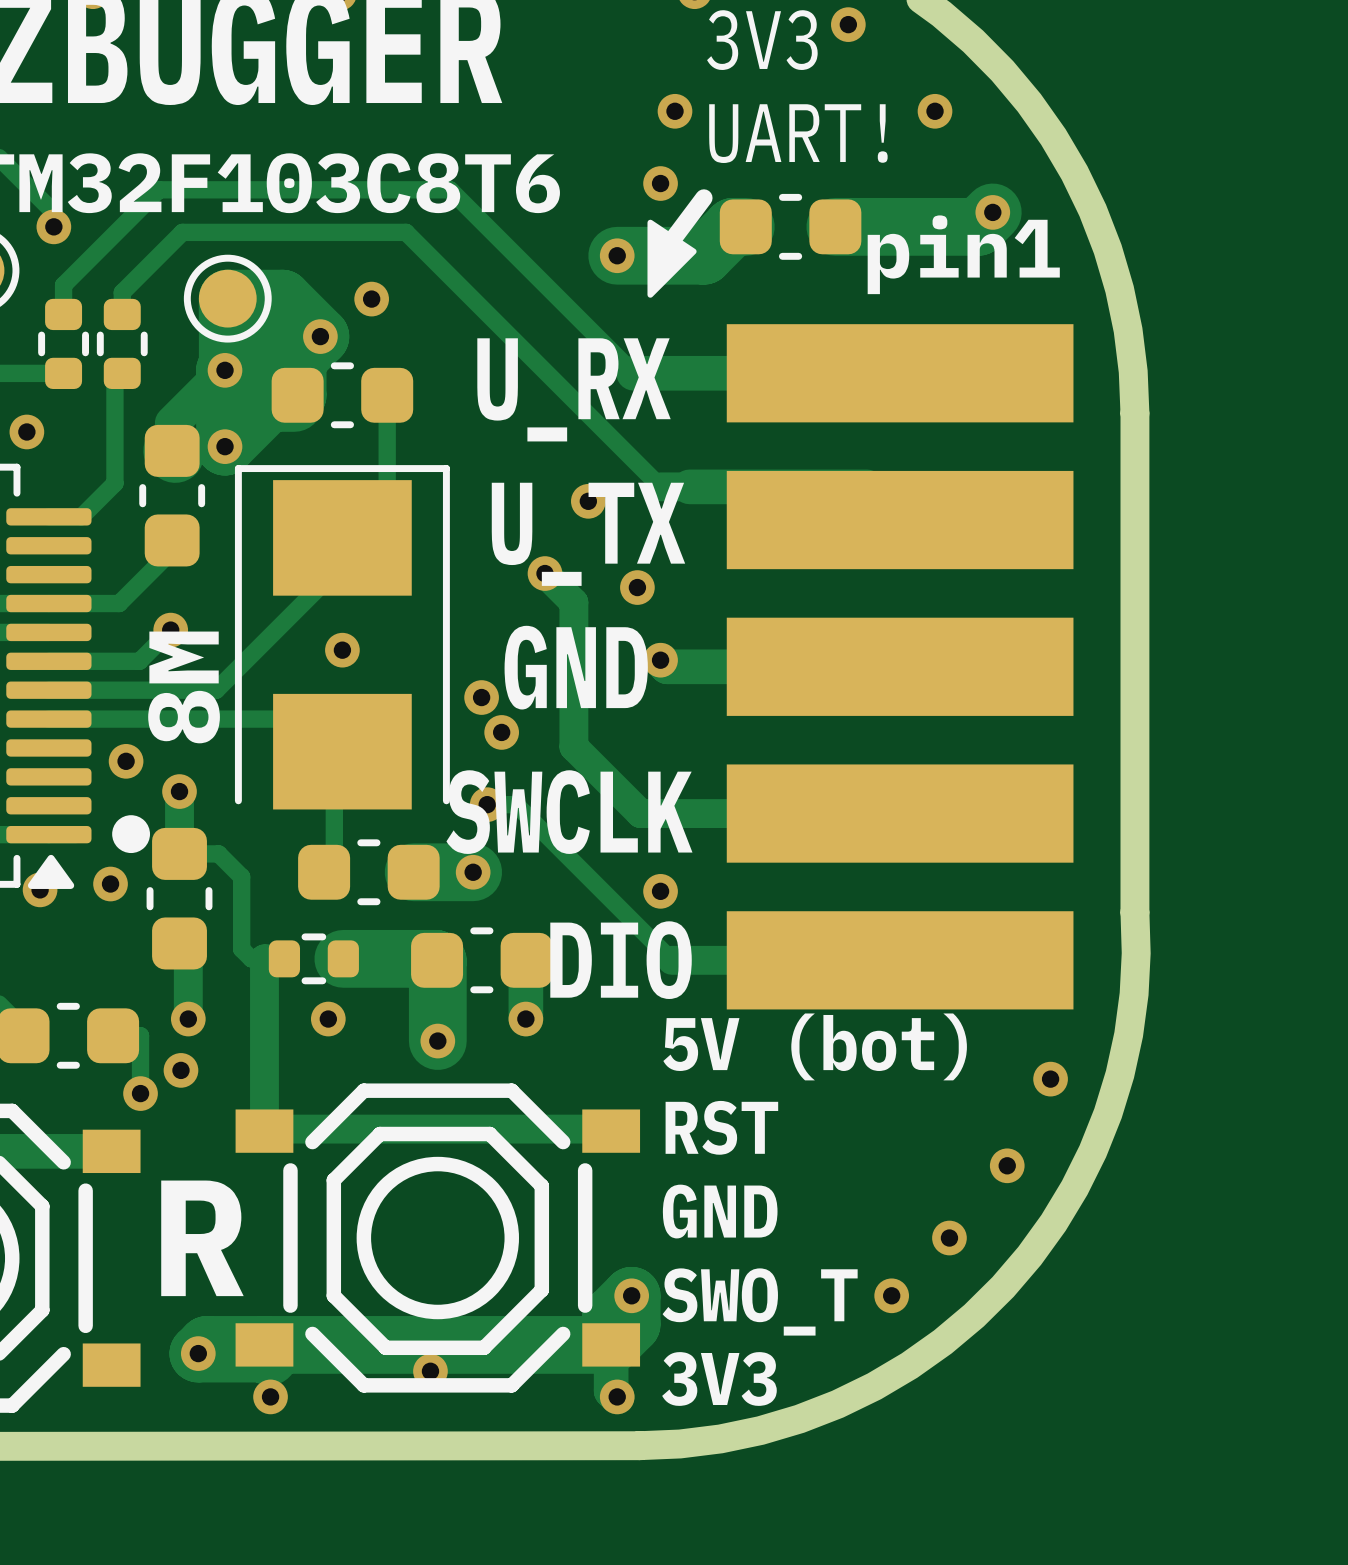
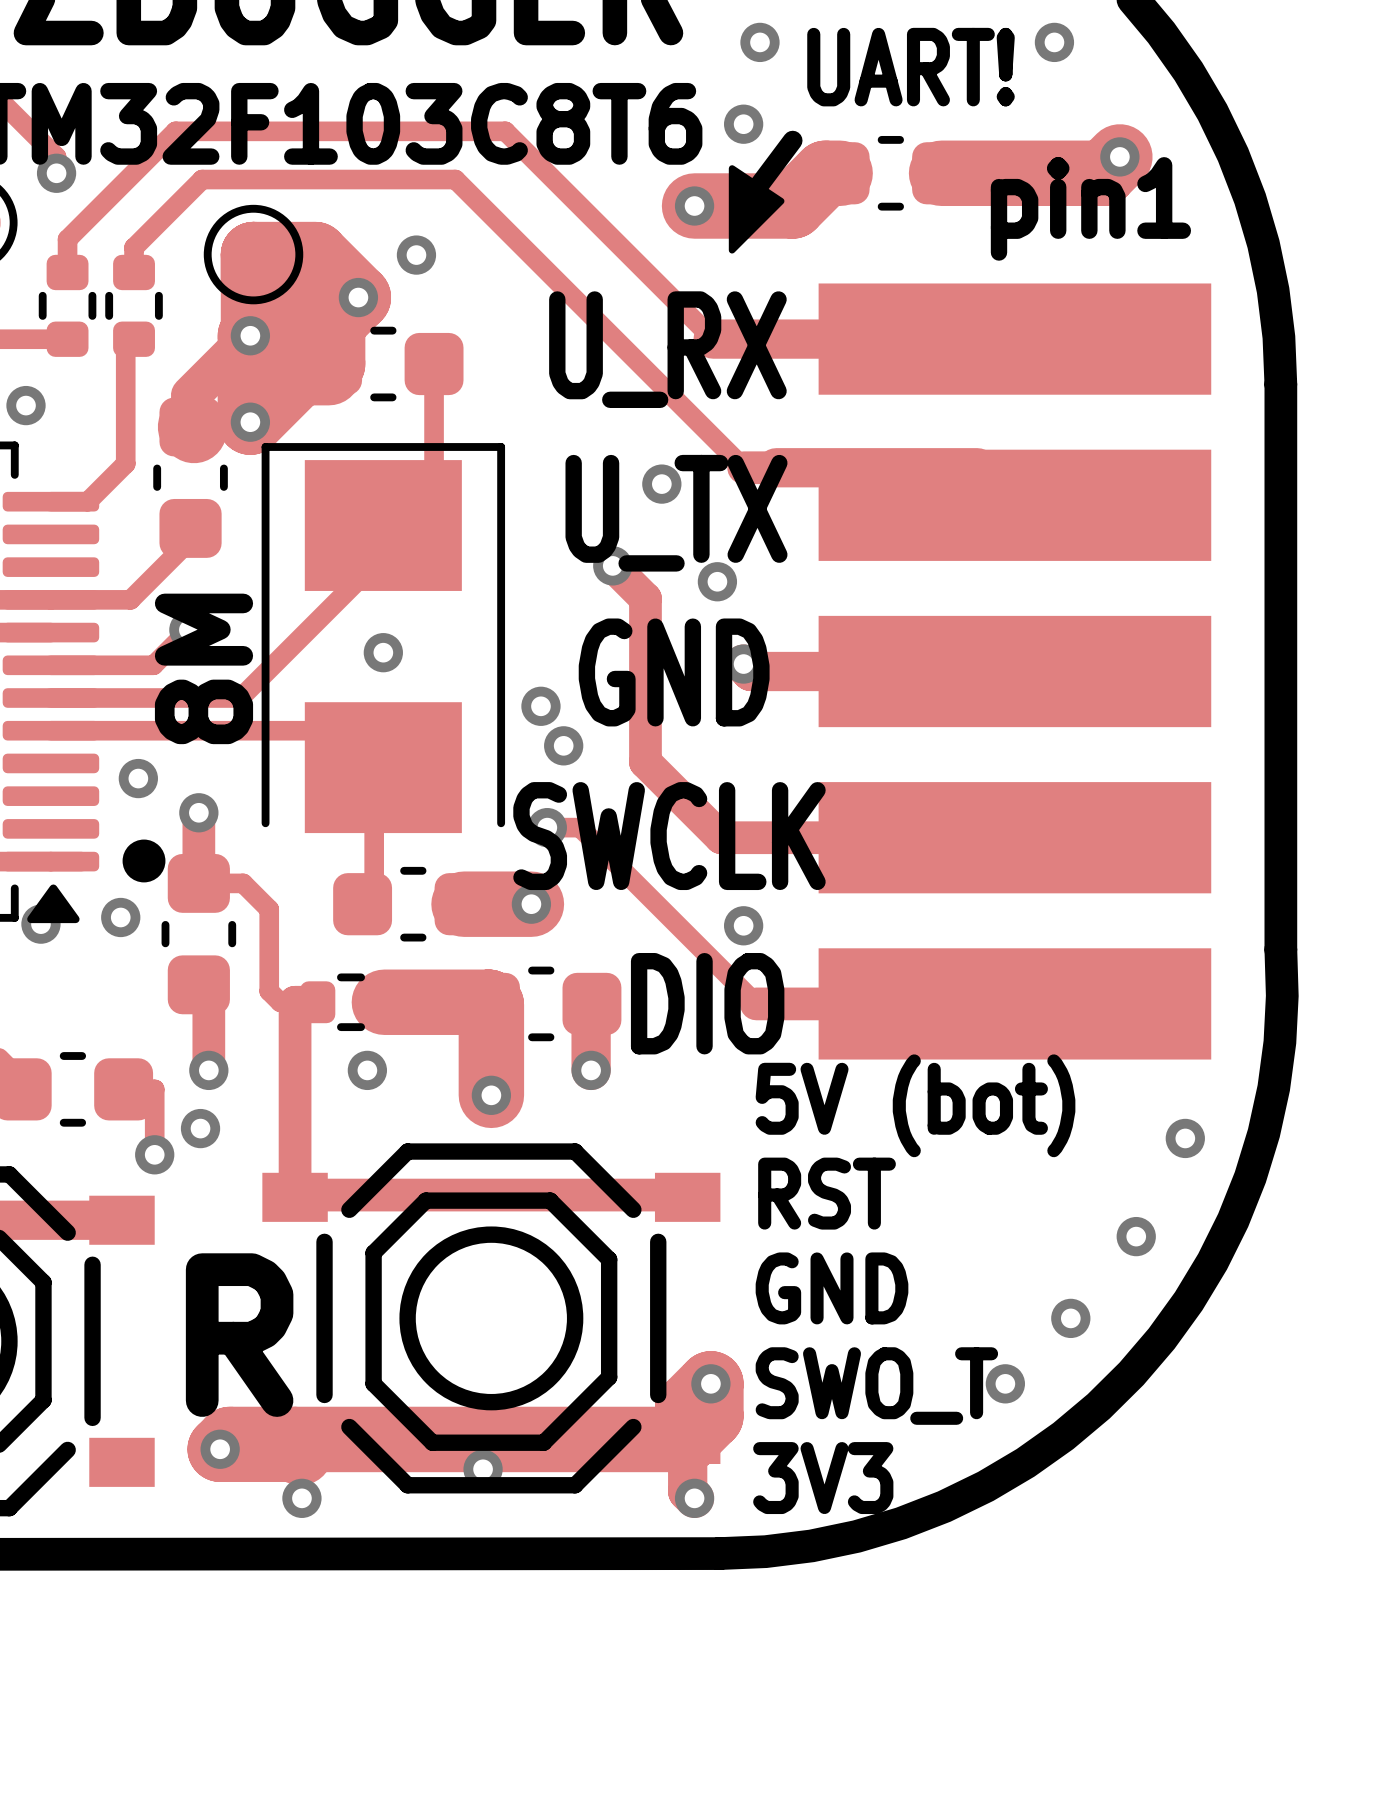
text position: R (202, 1238) -> R (239, 1335)

